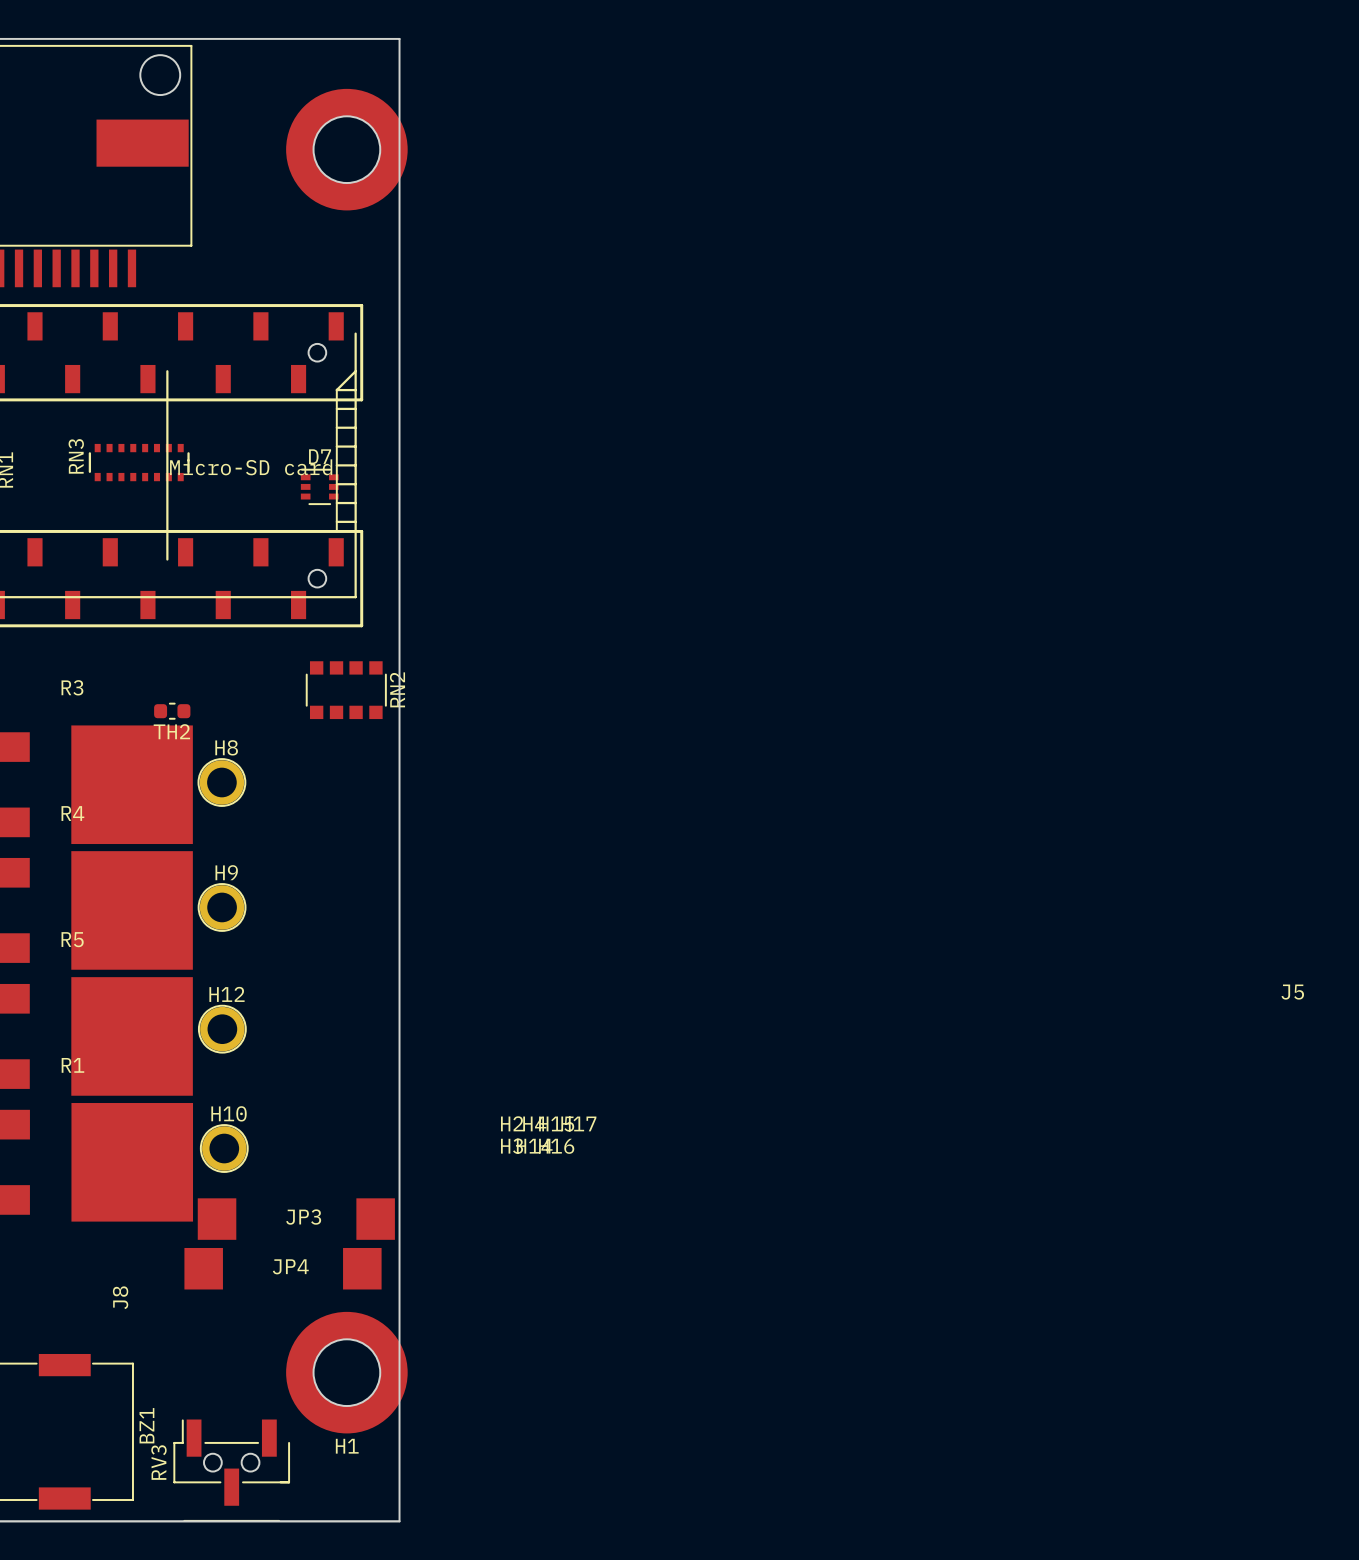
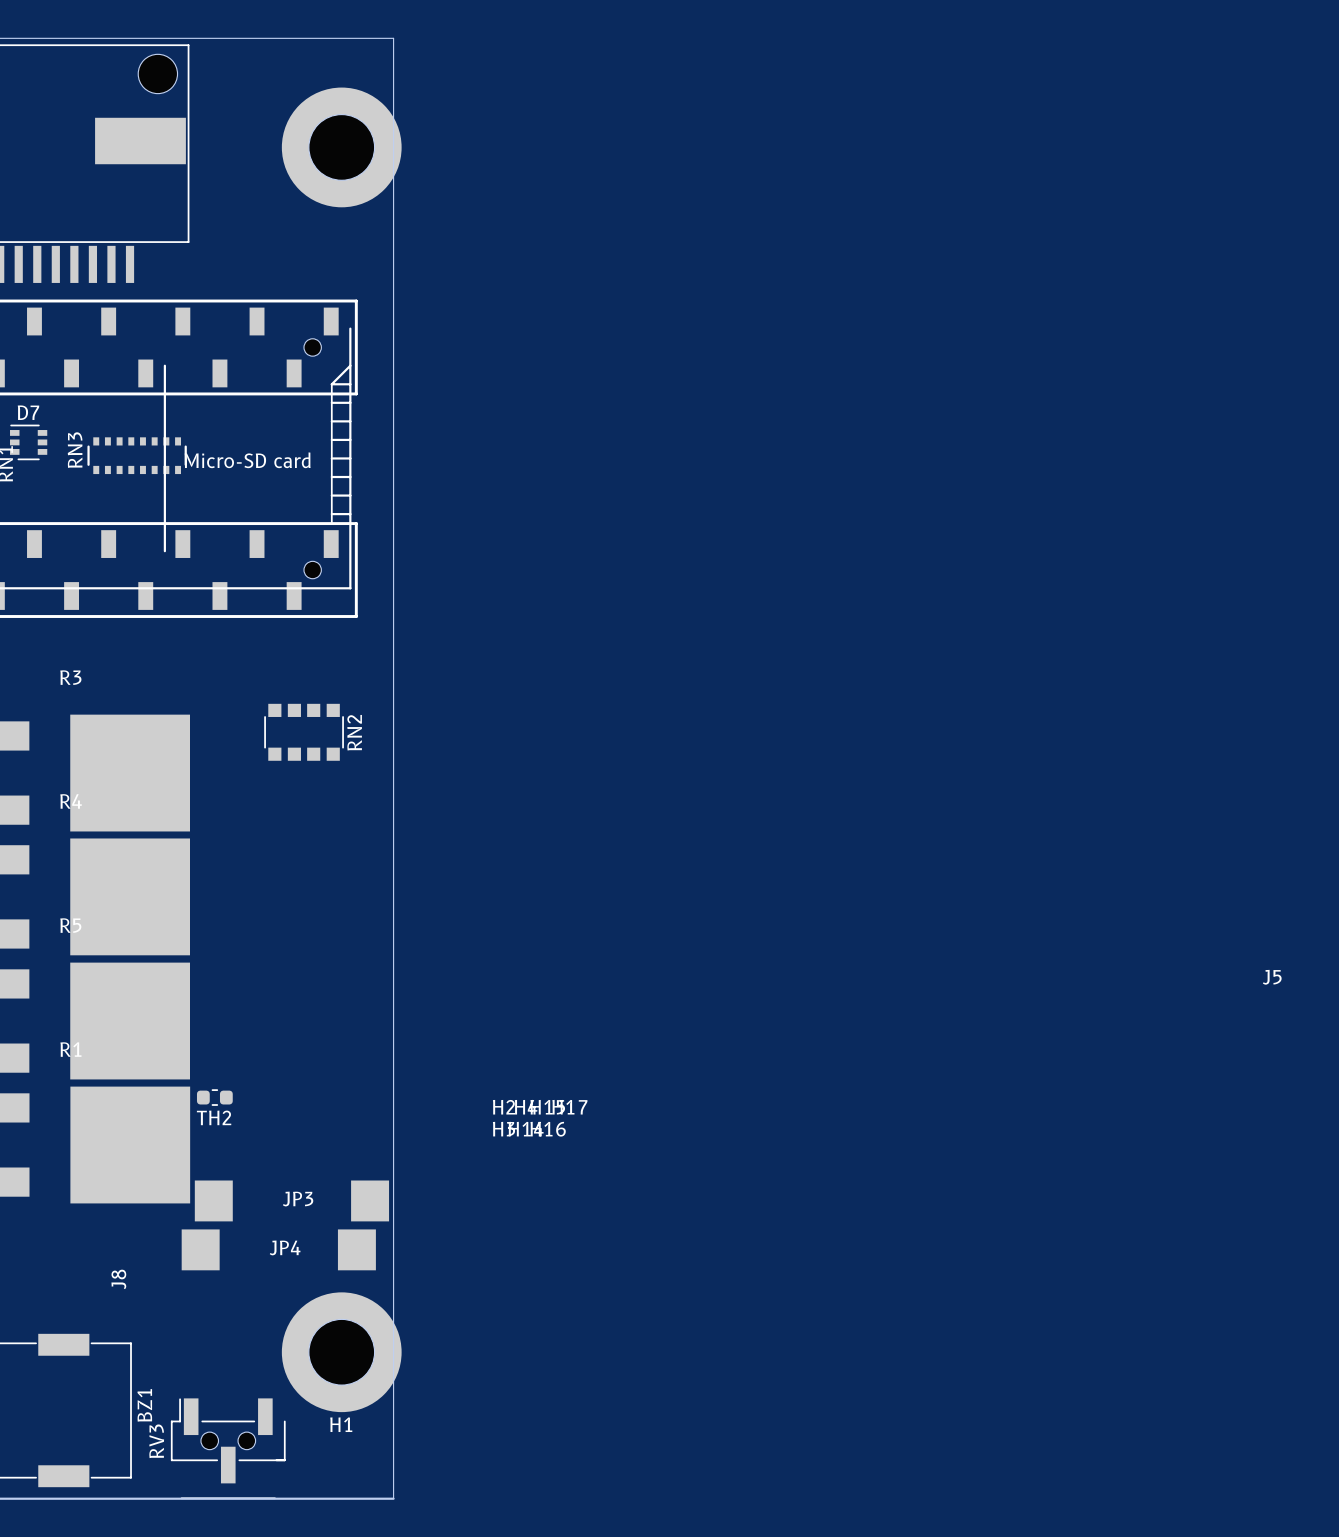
D7 position: (319, 486) -> (28, 442)
RN2 position: (346, 690) -> (304, 732)
TH2 position: (172, 711) -> (214, 1097)
H8: (221, 782) -> none
H9: (222, 907) -> none
H12: (222, 1029) -> none
H10: (224, 1148) -> none

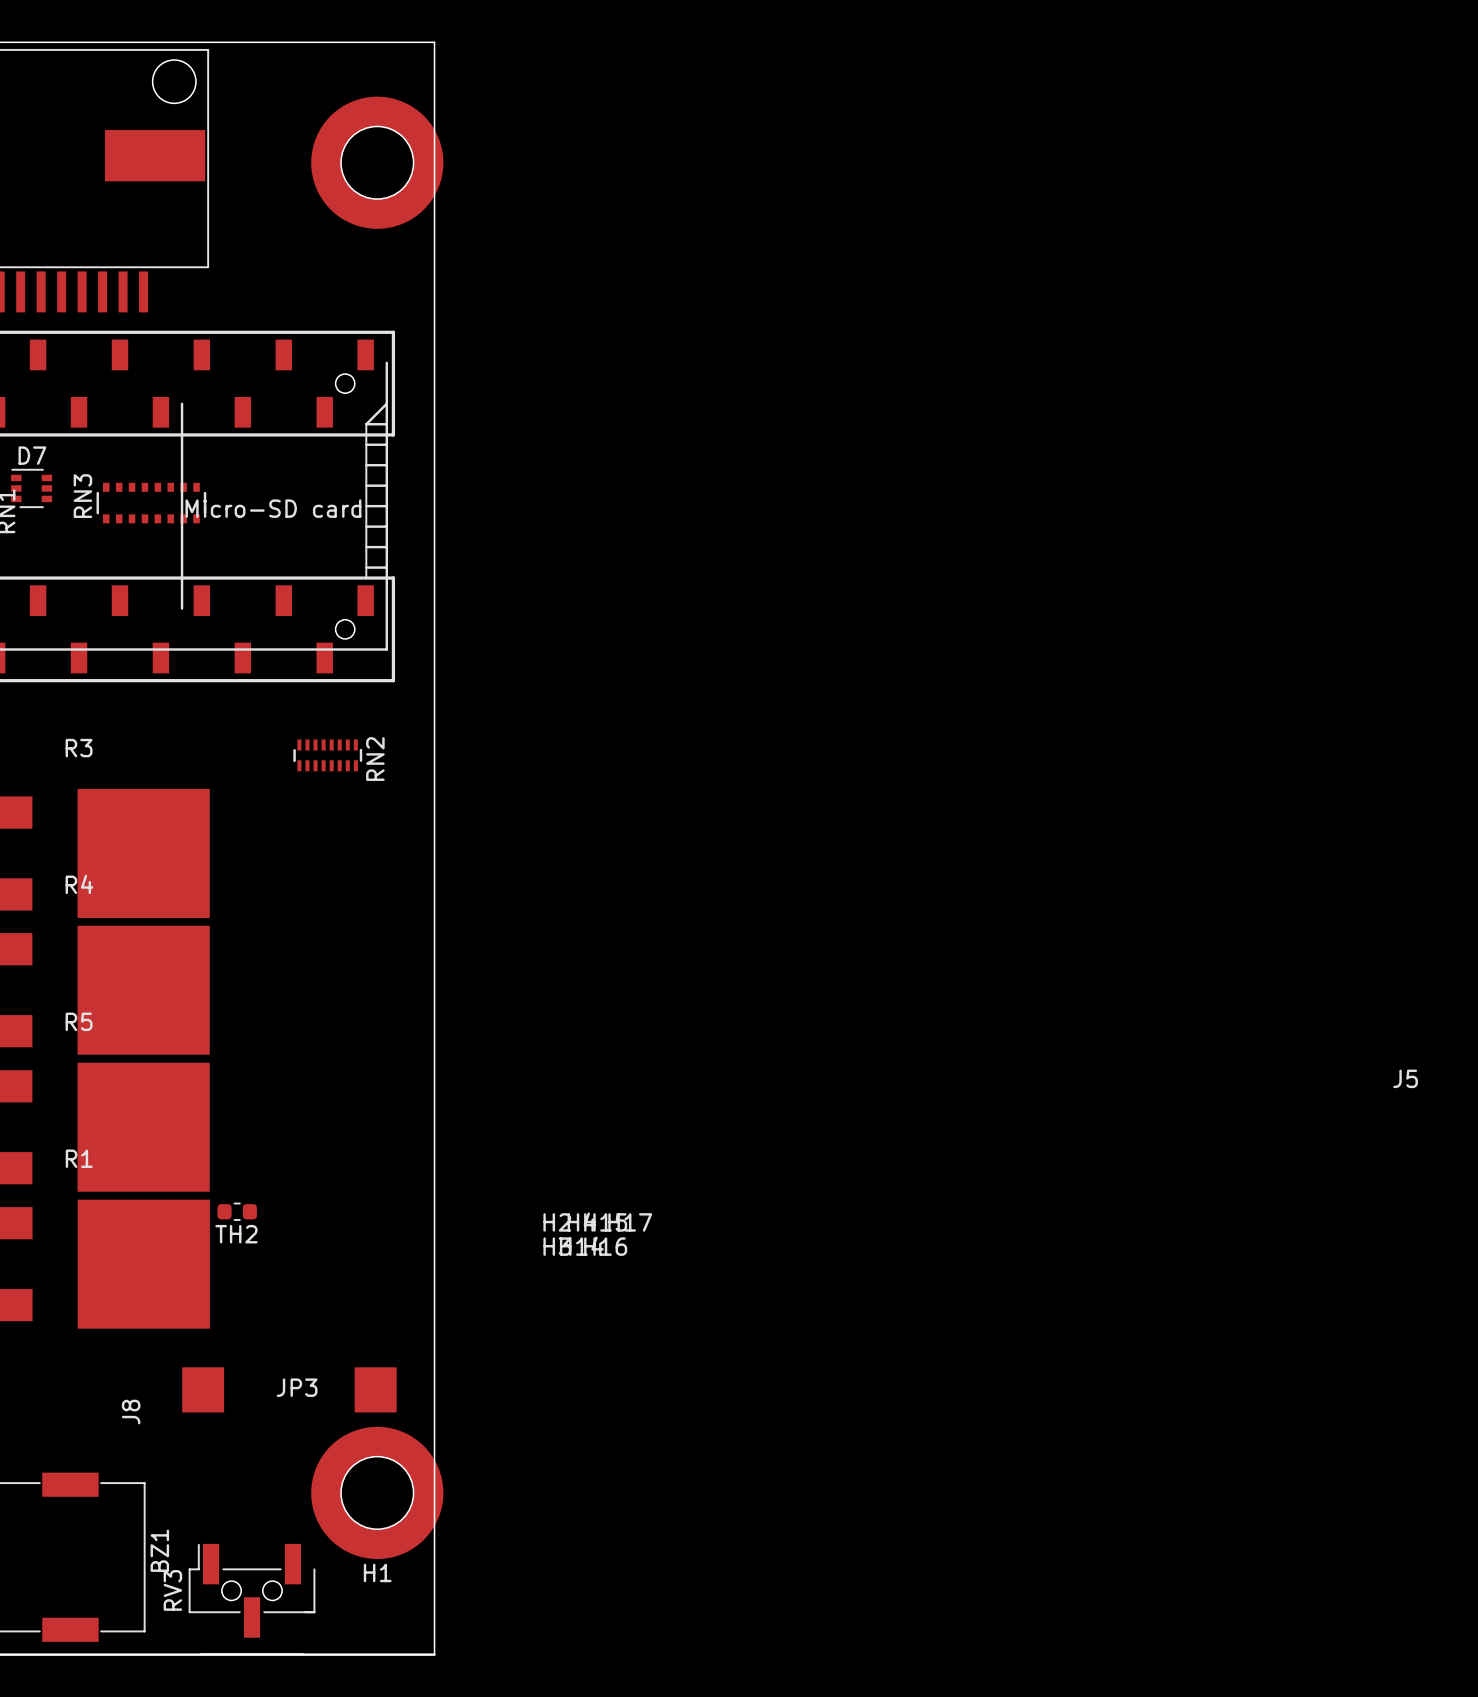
RN2 footprint: [264, 703, 344, 761] -> [293, 739, 363, 772]
JP3 position: (291, 1200) -> (289, 1389)
JP4: (278, 1249) -> none

